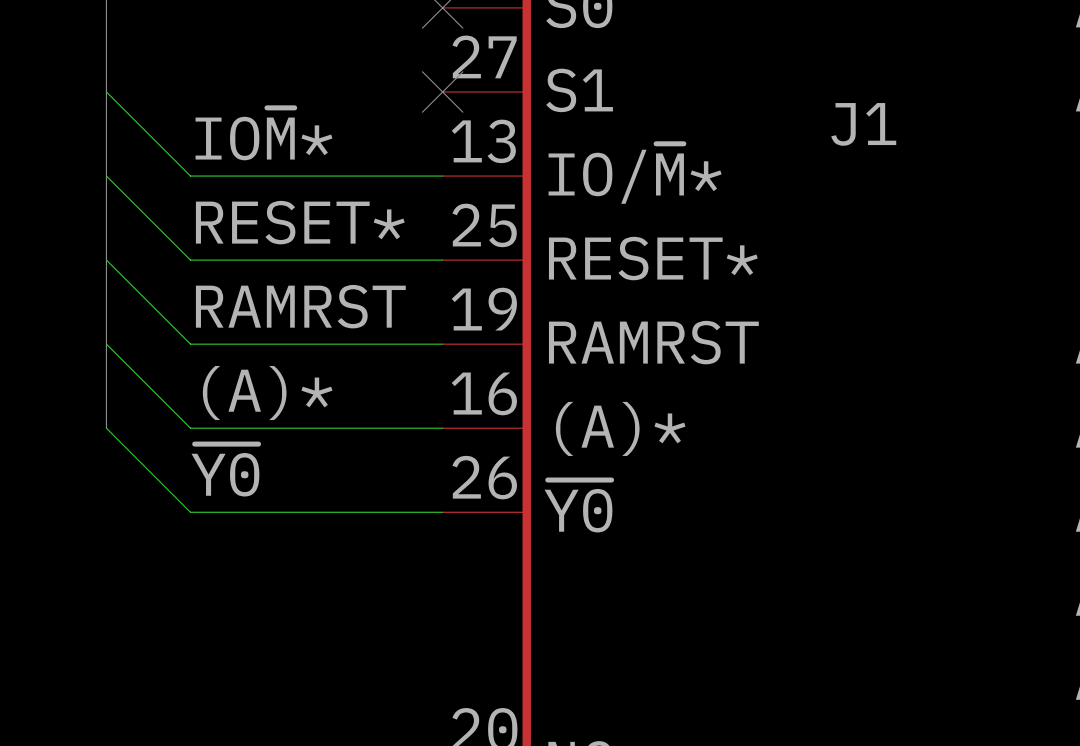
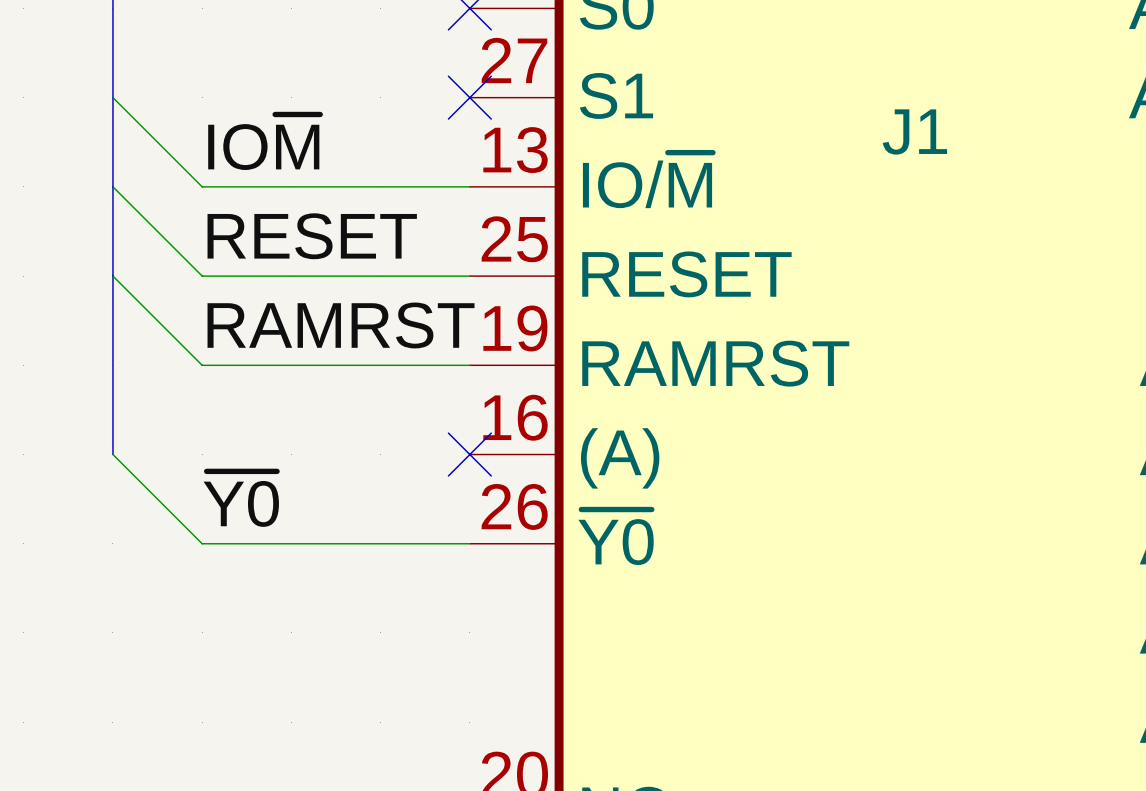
label: IO~{M}* (263, 134) -> IO~{M} (264, 142)
J1 pin name: IO/~{M}* (635, 173) -> IO/~{M} (647, 180)
label: RESET* (300, 222) -> RESET (312, 236)
J1 pin name: RESET* (653, 258) -> RESET (686, 274)
wire: (106, 344) (190, 428) (442, 428) -> none
label: (A)* (267, 393) -> none
no-connect mark: none -> (469, 454)
J1 pin name: (A)* (620, 428) -> (A) (620, 458)

